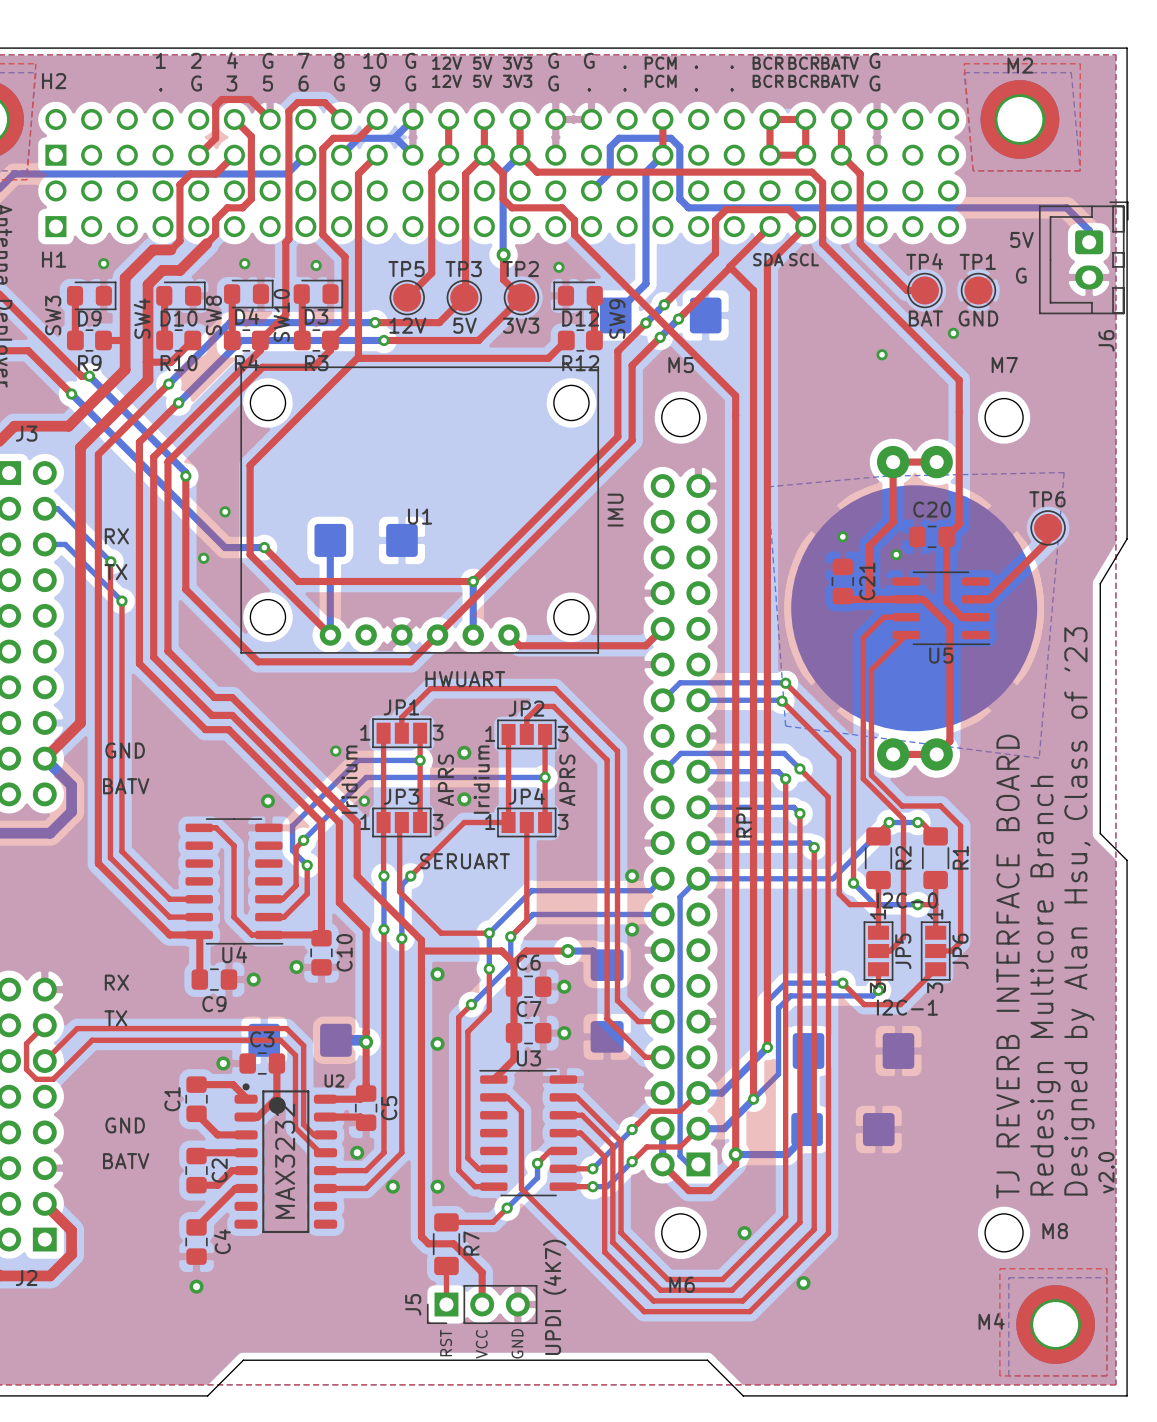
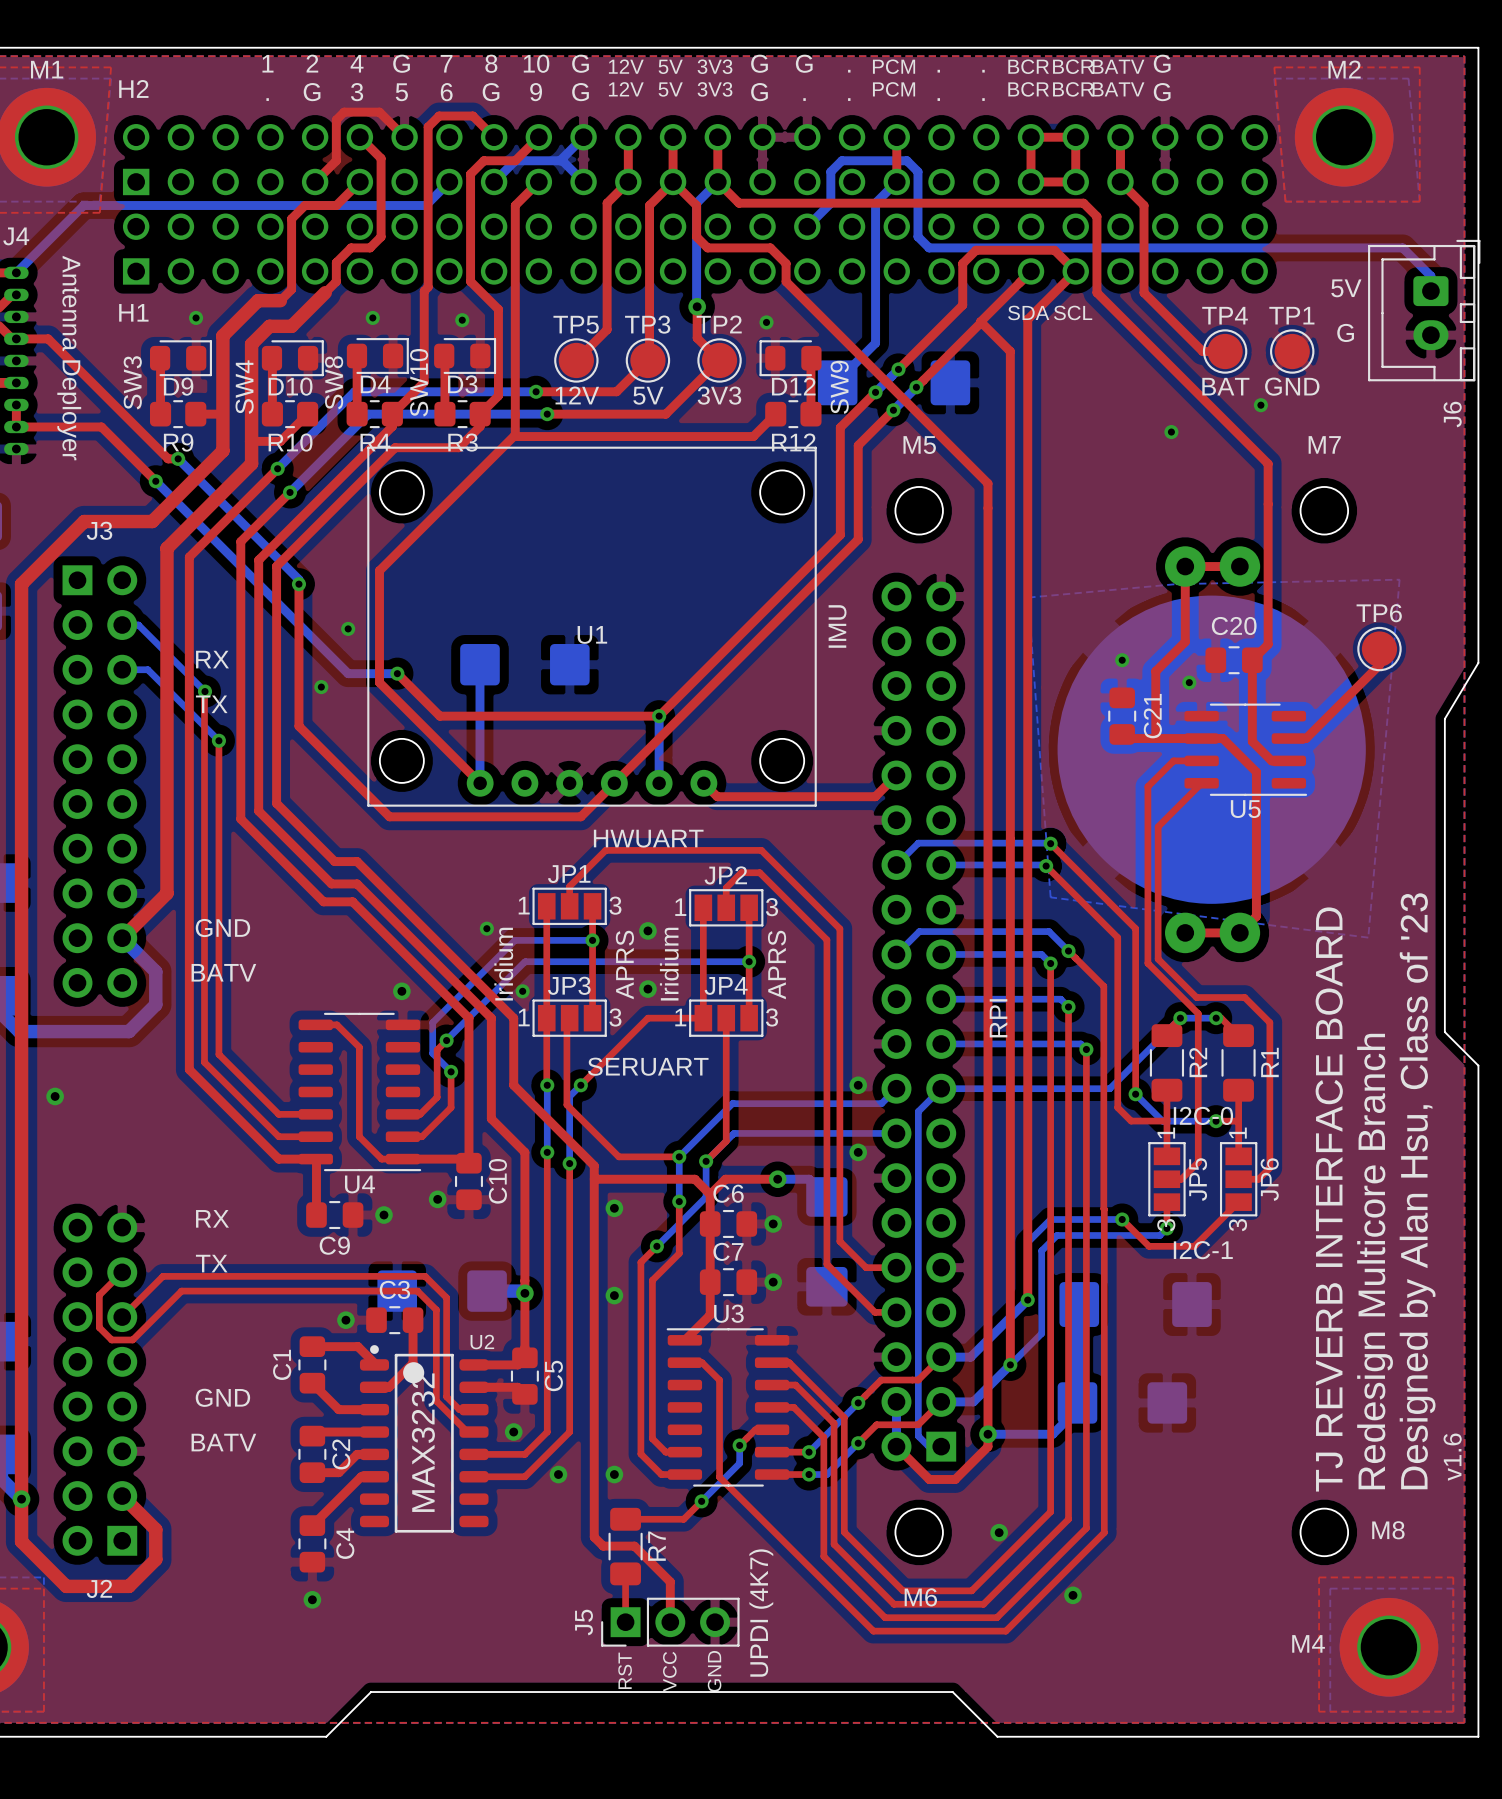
text: v2.0 (1106, 1172) -> v1.6 (1452, 1457)

